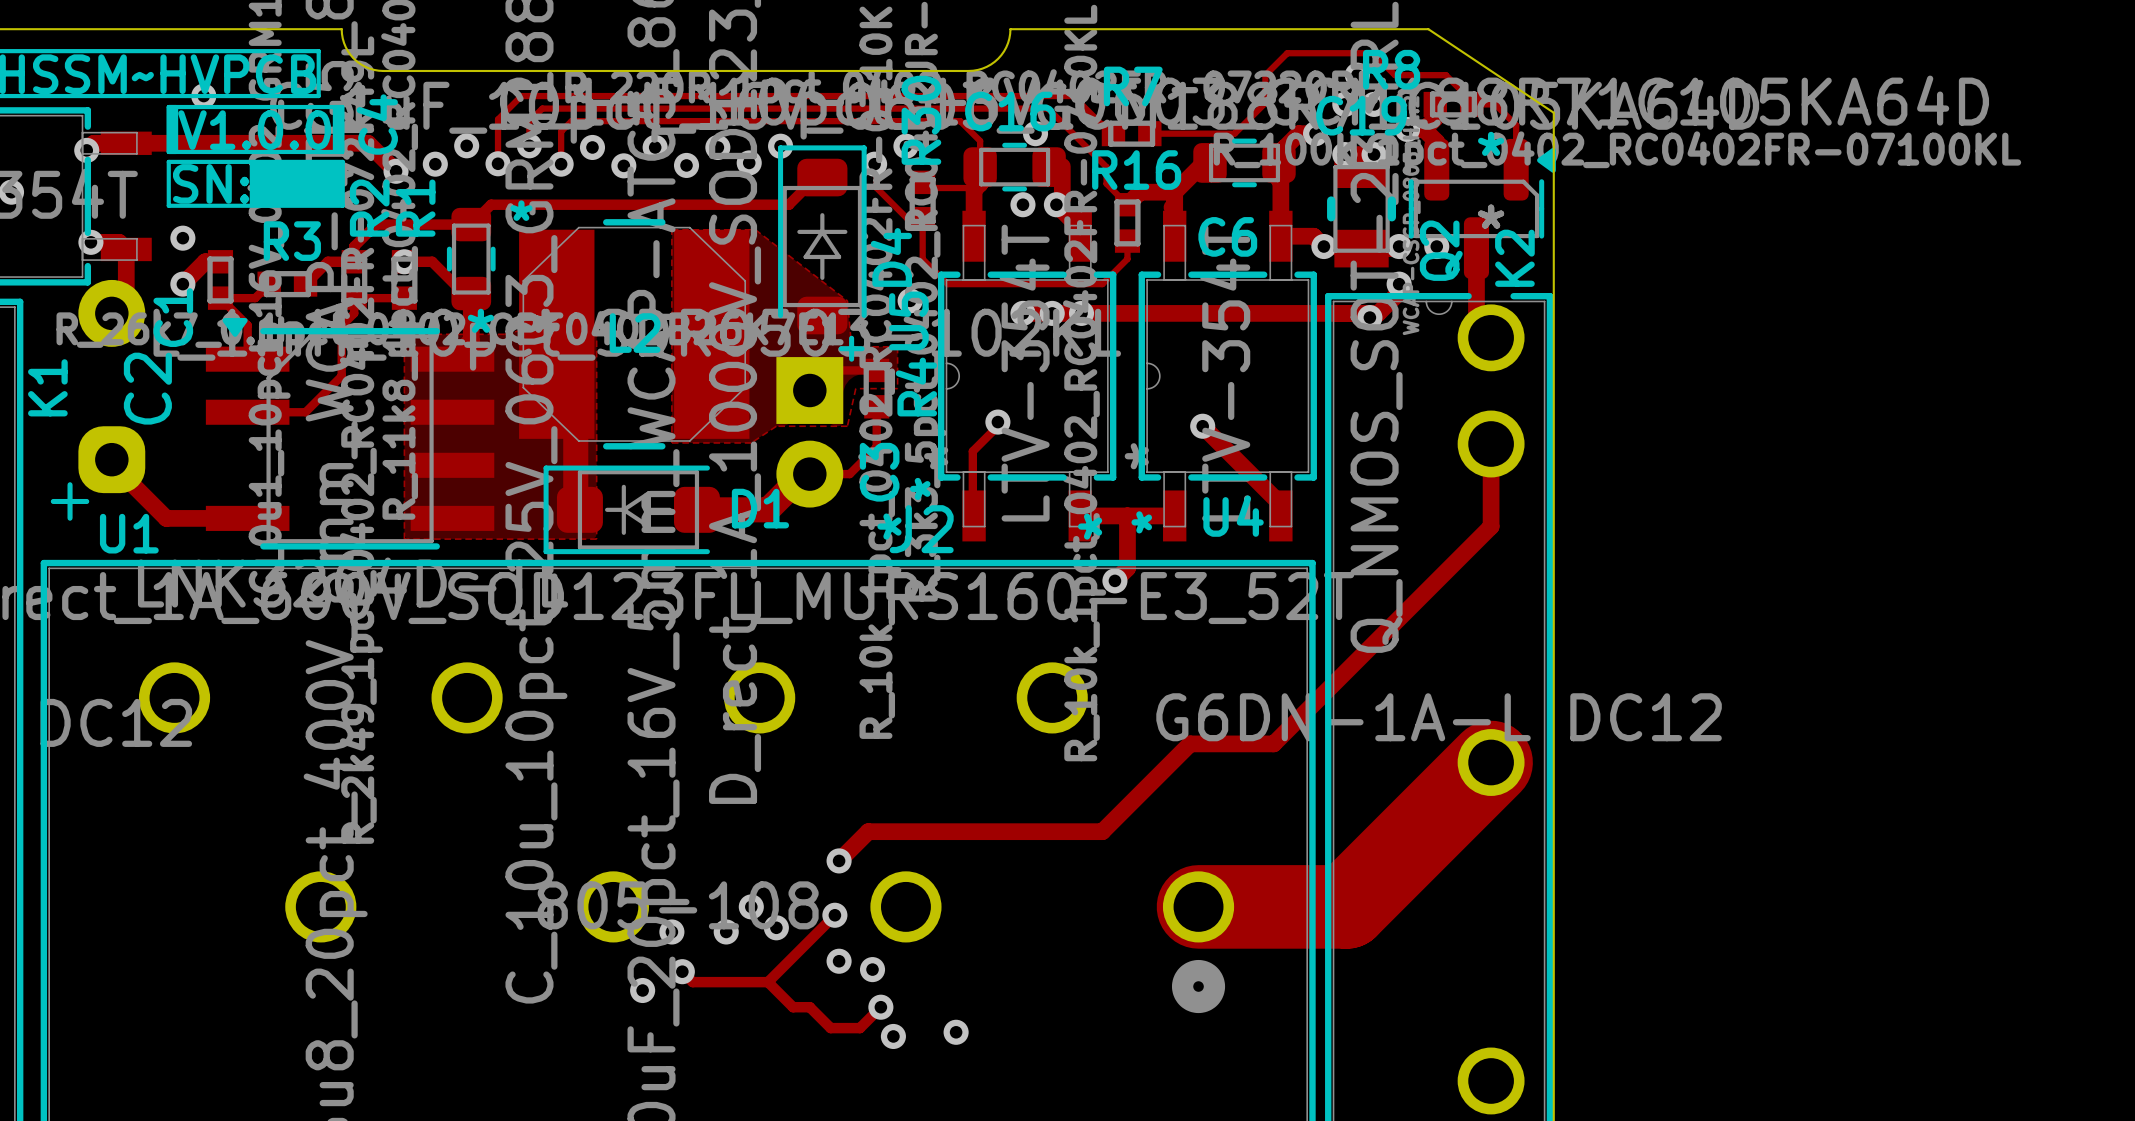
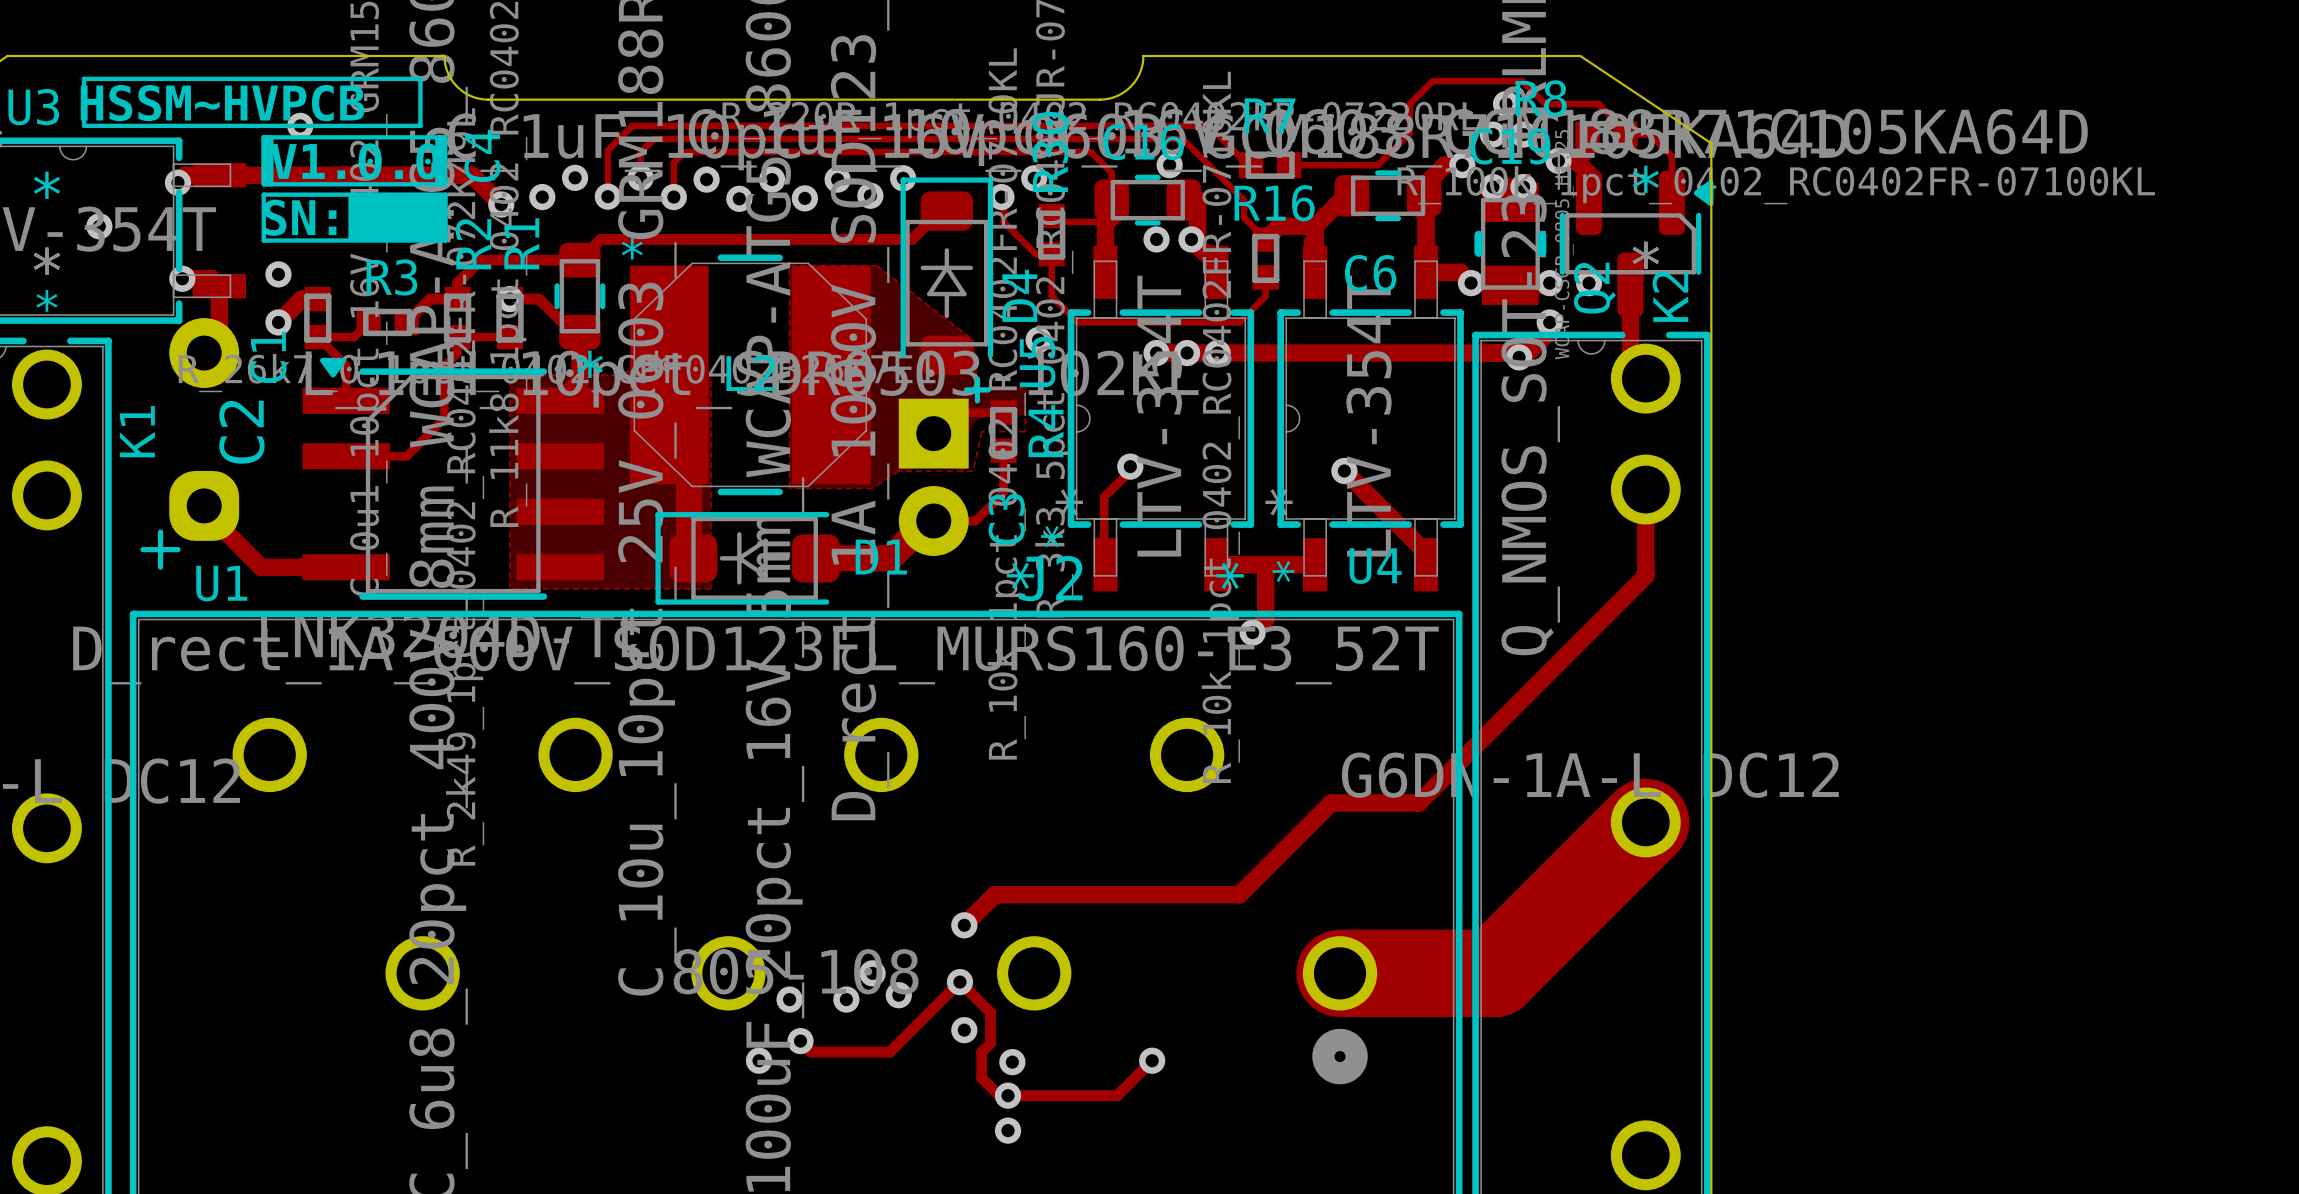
track: none -> (959, 982) (990, 1012) (990, 1043) (981, 1051) (981, 1078) (999, 1095) (1117, 1095) (1152, 1060)
via: (872, 969) -> none
track: (768, 982) (793, 1007) (809, 1007) (830, 1028) (859, 1028) (880, 1007) -> none
via: none -> (1152, 1060)
via: none -> (1012, 1062)
via: (880, 1007) -> none
via: none -> (1008, 1095)
via: (956, 1032) -> none
via: (893, 1036) -> none
via: none -> (1008, 1130)

